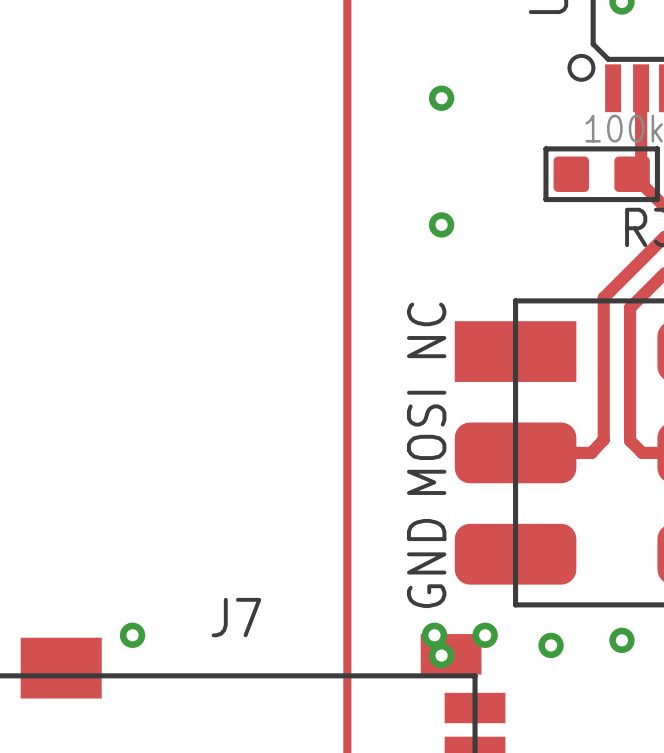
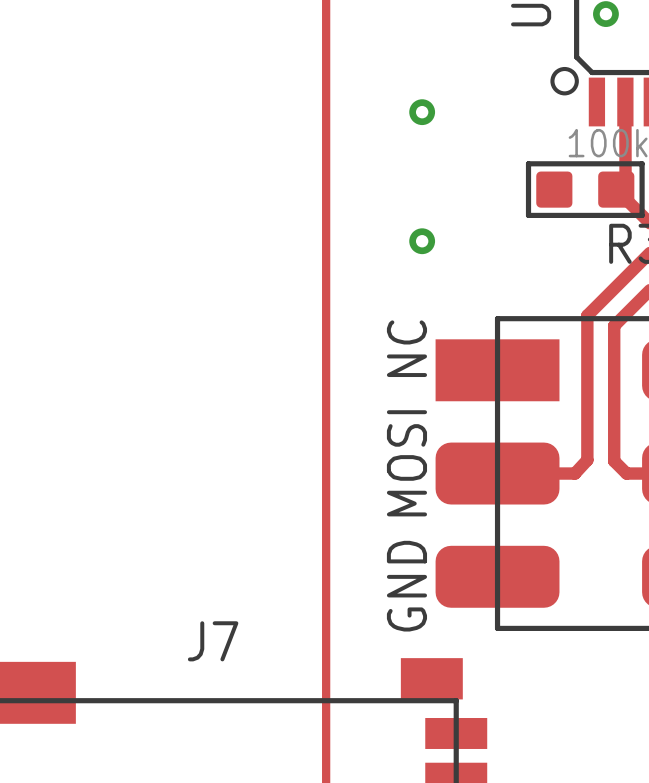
via: (132, 635) -> none
via: (434, 635) -> none
via: (485, 635) -> none
via: (621, 640) -> none
via: (551, 645) -> none
via: (441, 655) -> none

